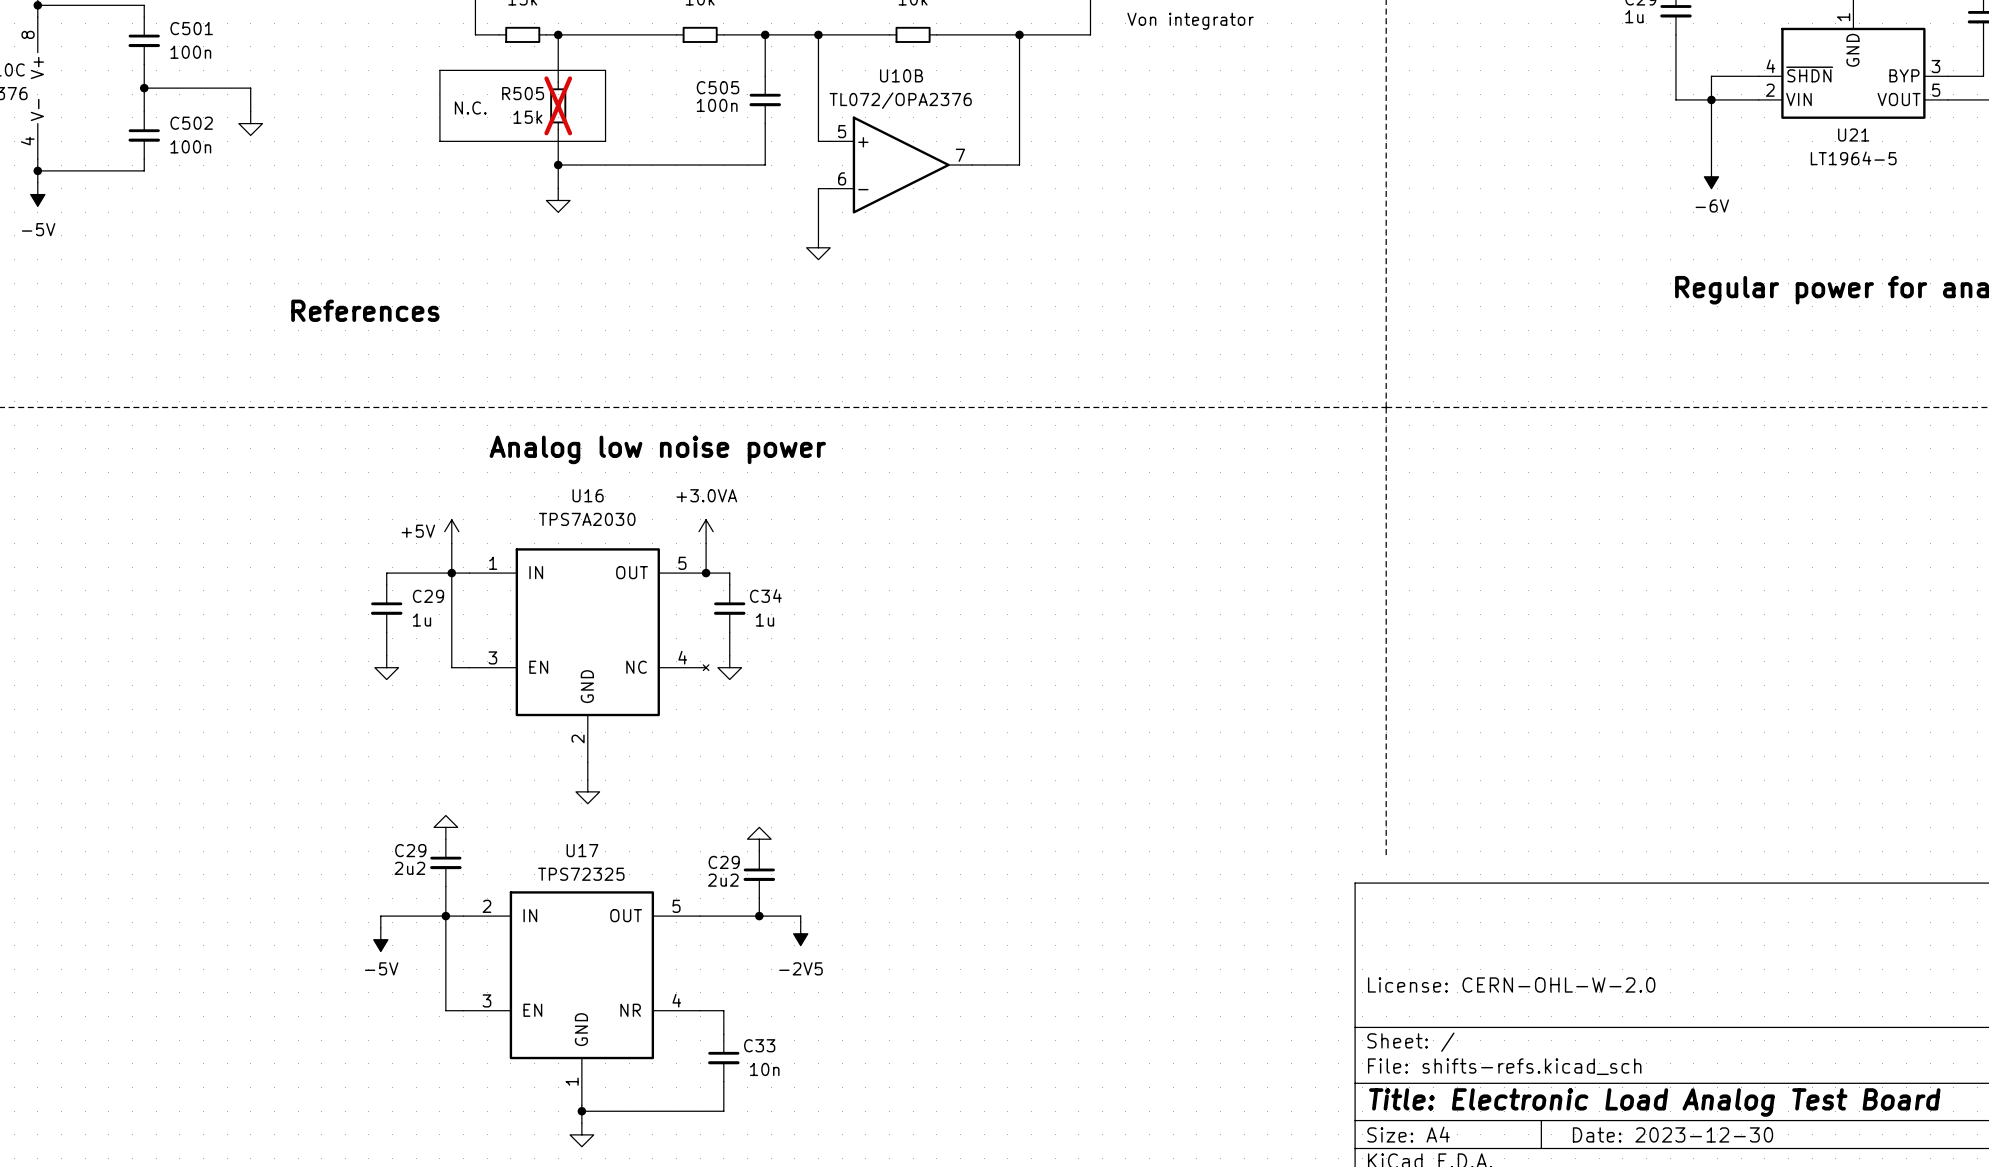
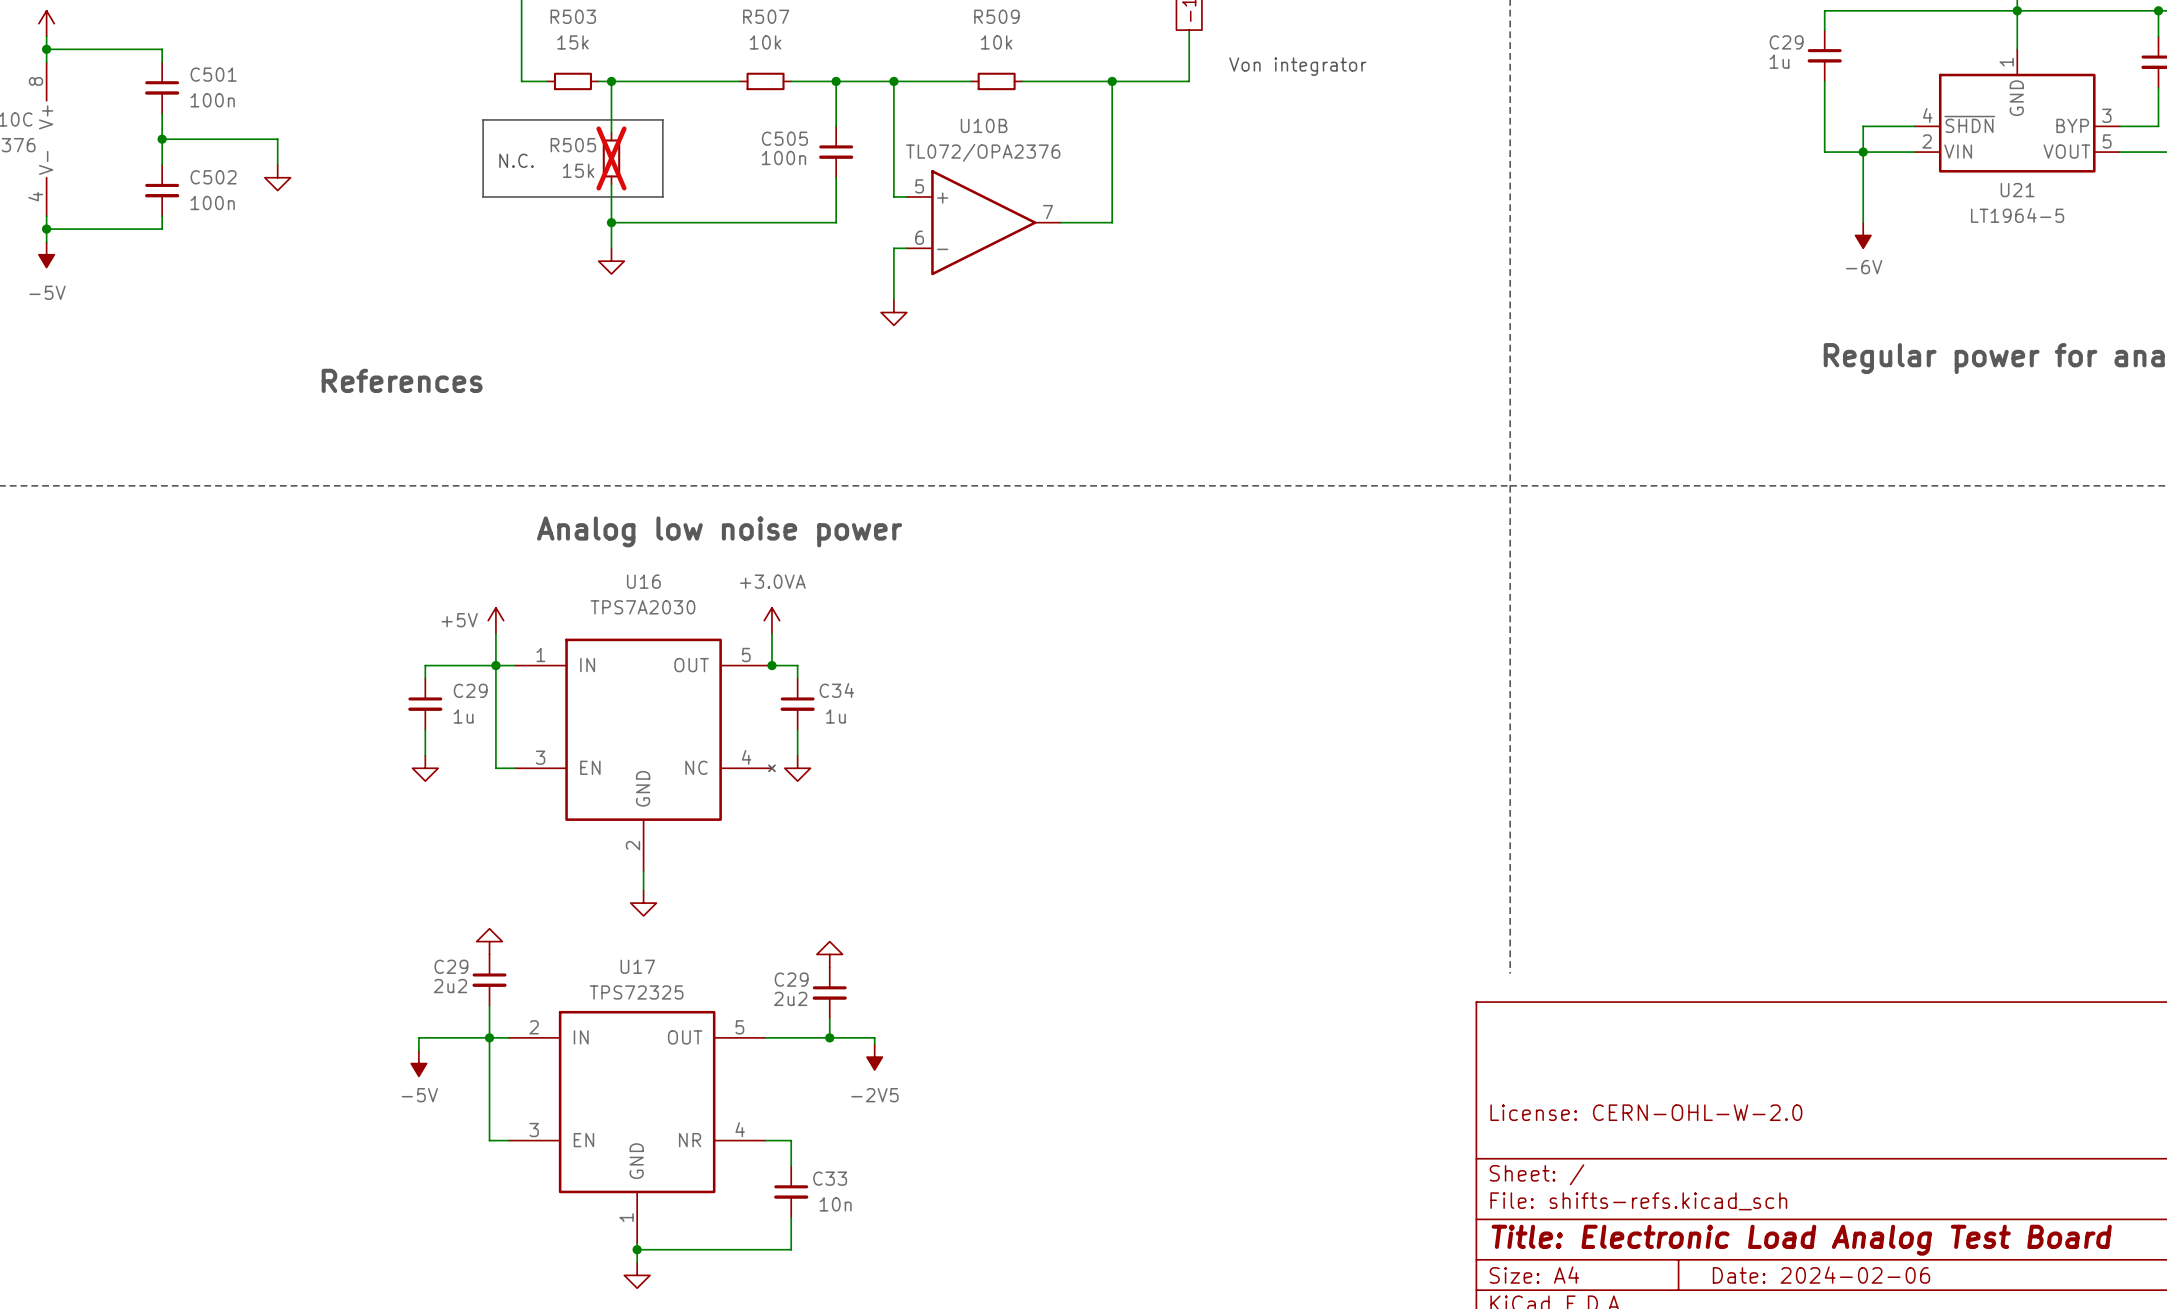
title block: Date: 2023-12-30 (1673, 1134) -> Date: 2024-02-06 (1821, 1275)

